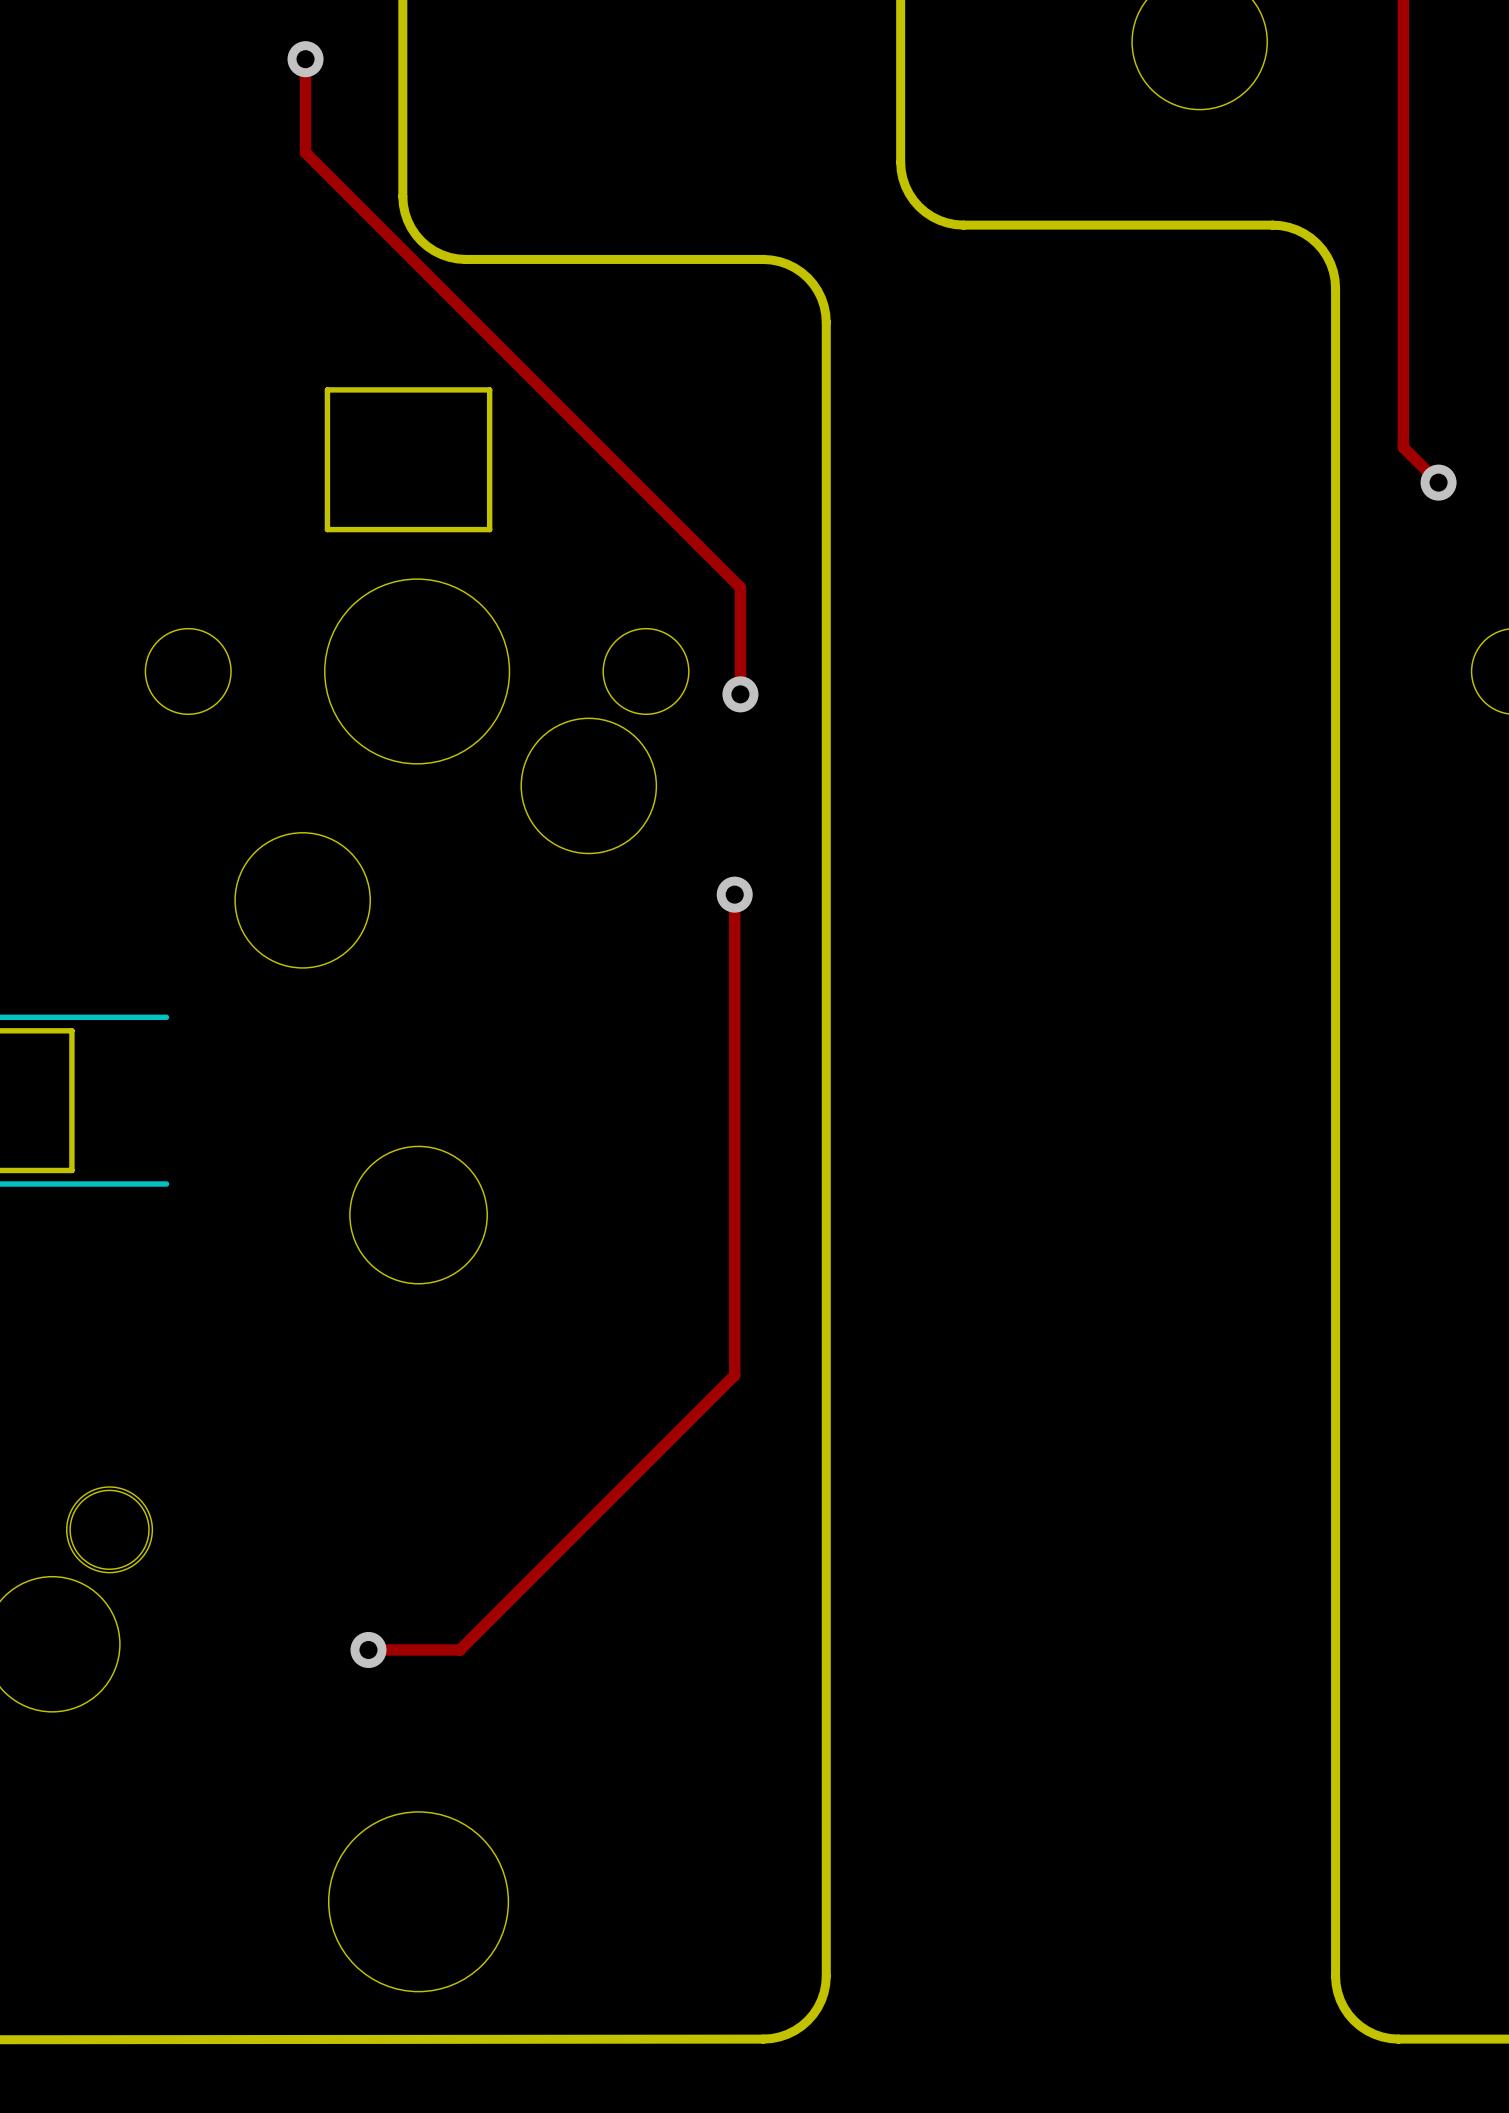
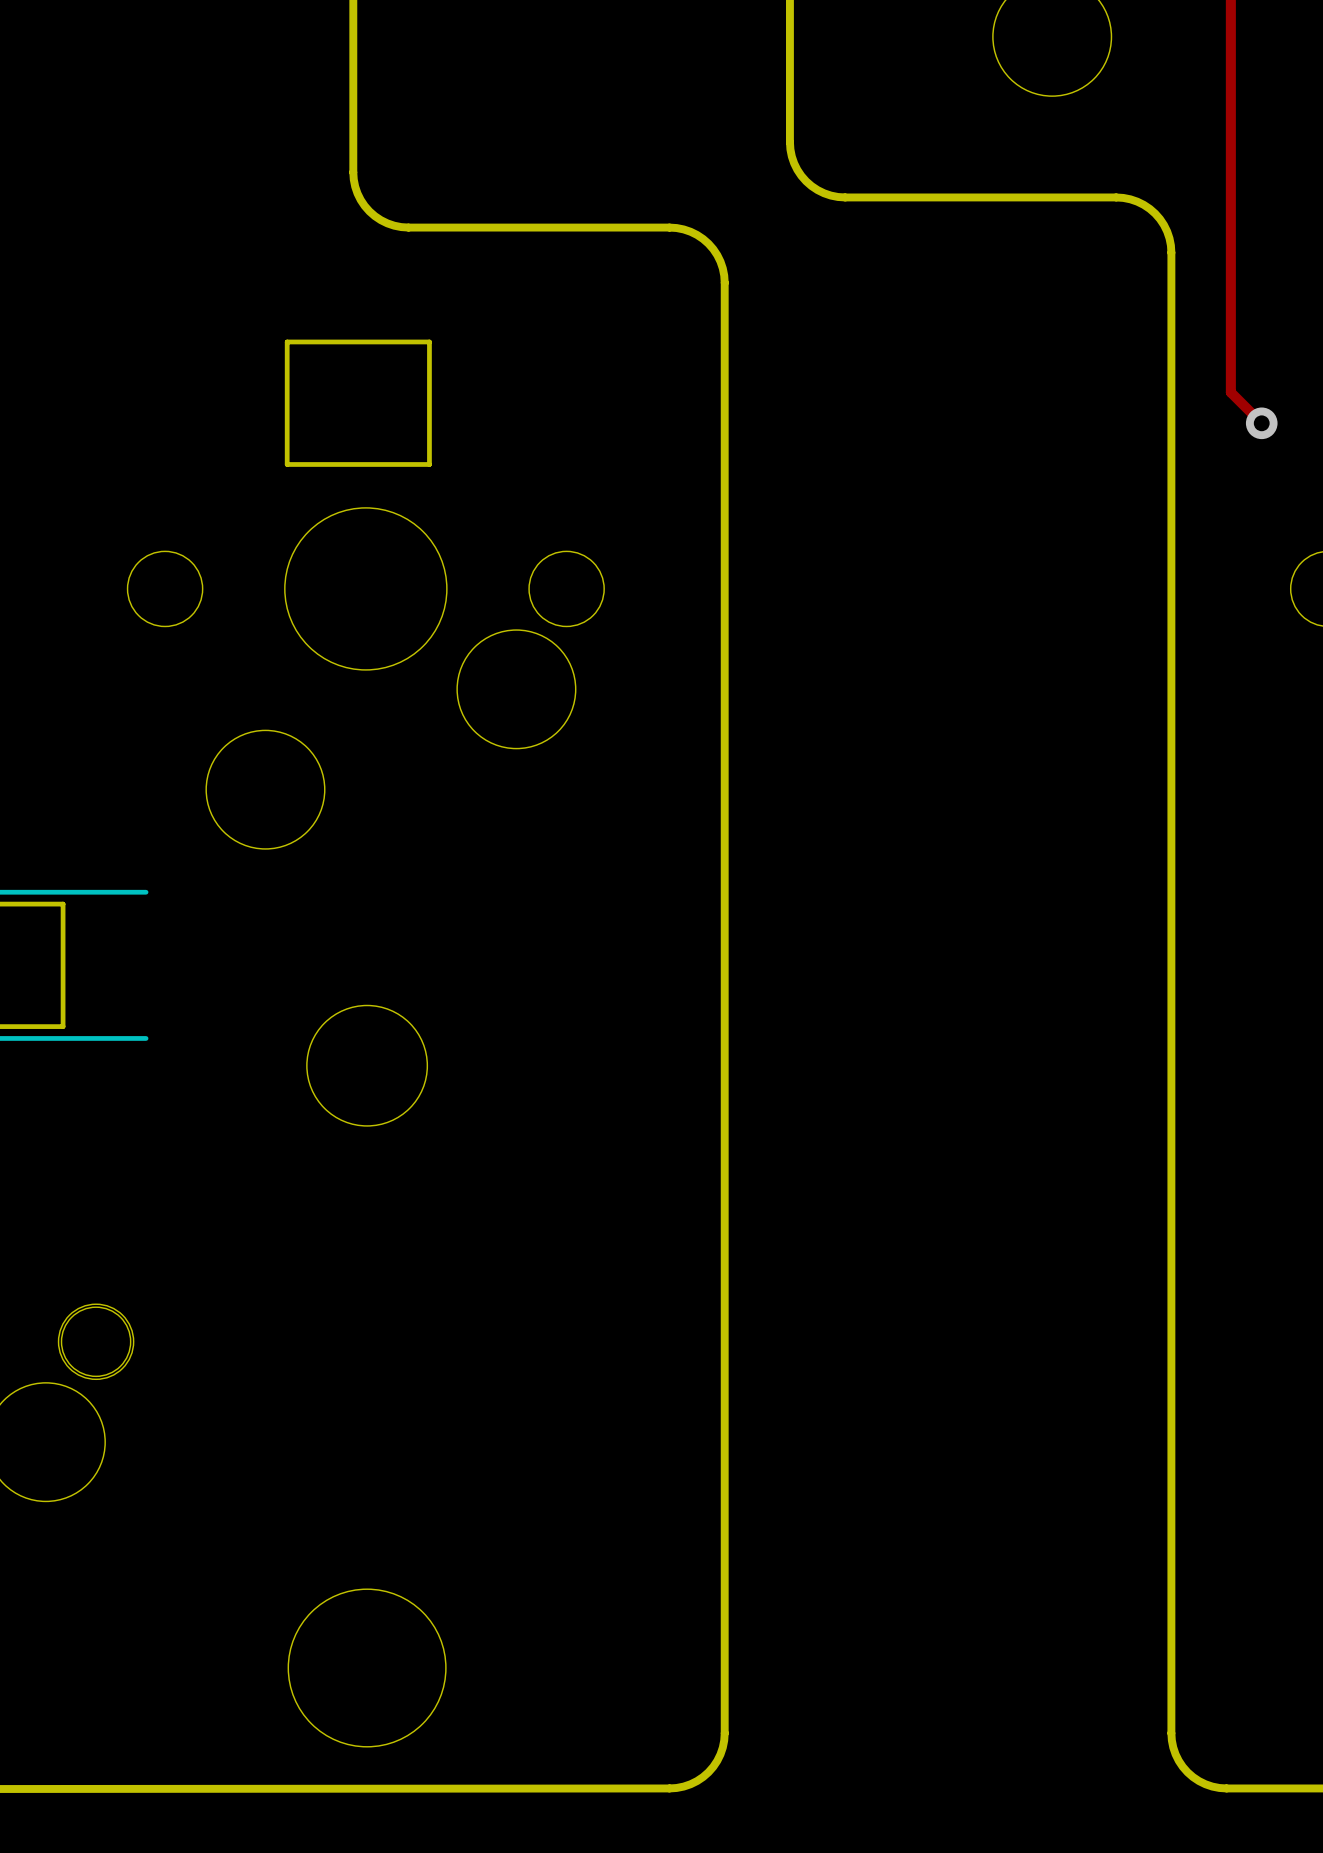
track: (305, 59) (305, 152) (740, 587) (740, 694) -> none
via: (305, 59) -> none
via: (740, 694) -> none
track: (734, 894) (734, 1375) (460, 1649) (368, 1649) -> none
via: (734, 894) -> none
via: (368, 1649) -> none

